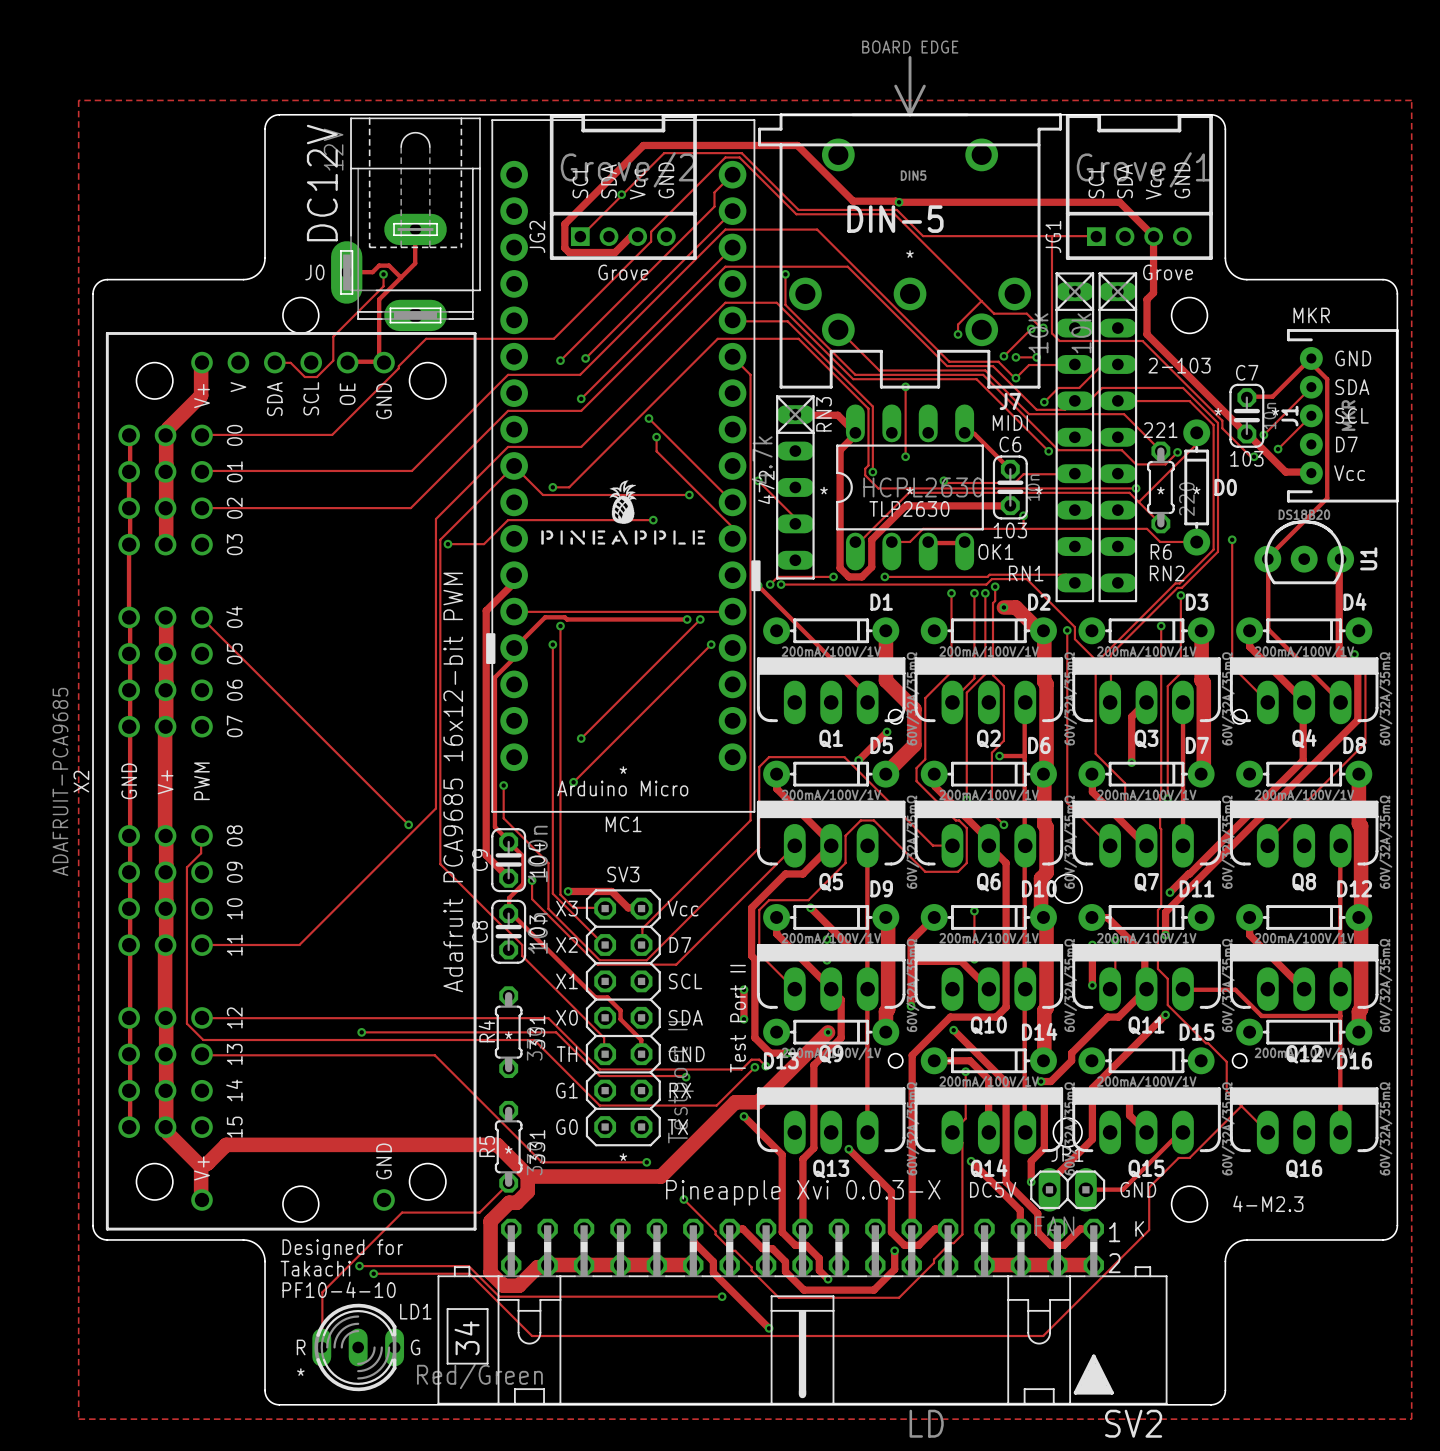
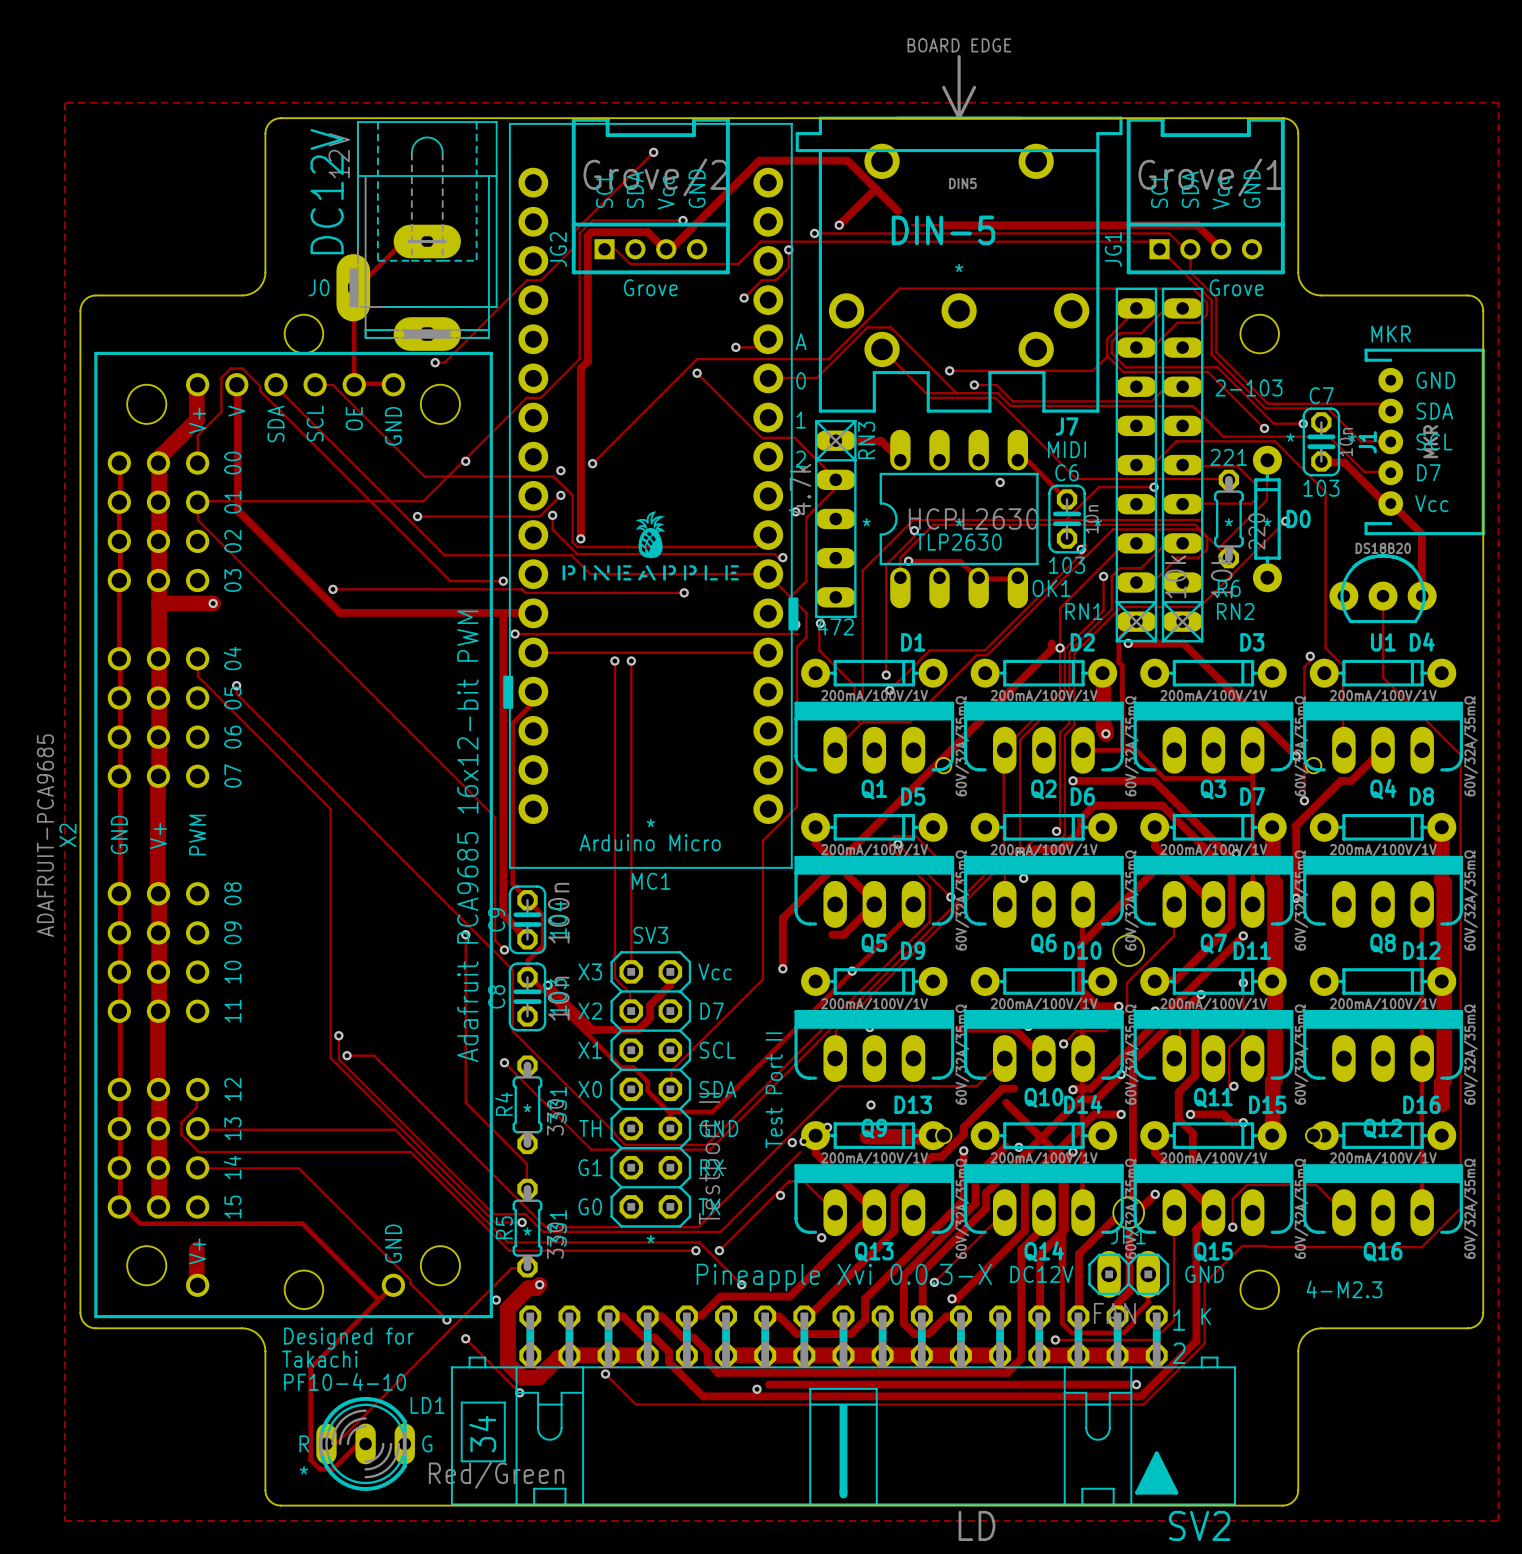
track: none -> (653, 152) (574, 231) (574, 246) (540, 280) (526, 280) (444, 362) (435, 362)
via: none -> (653, 152)
track: (806, 154) (797, 145) (643, 145) (568, 220) -> (847, 160) (759, 160) (671, 248) (663, 247) (647, 232) (591, 232)
track: (732, 174) (714, 192) (714, 206) (560, 360) -> none
track: none -> (875, 188) (839, 225)
via: (621, 194) -> none
track: (853, 201) (1119, 202) (1131, 214) -> (942, 225) (1197, 225)
via: (899, 202) -> none
via: none -> (683, 220)
track: (732, 211) (585, 358) -> none
via: none -> (839, 225)
track: (866, 214) (796, 214) (739, 157) (725, 157) (651, 231) (651, 241) (553, 338) (426, 338) (332, 434) (202, 434) -> (503, 581) (450, 581) (260, 390) (260, 386) (242, 368) (230, 368) (221, 377) (221, 411) (197, 435) (197, 462)
track: (894, 214) (994, 313) (1026, 313) (1043, 327) -> none
via: none -> (814, 233)
track: (415, 229) (415, 263) (379, 299) (379, 360) (384, 362) -> (426, 241) (403, 241) (356, 288) (353, 287) (354, 384)
track: (817, 229) (949, 361) (998, 361) (1015, 378) (1029, 365) (1074, 364) -> (859, 241) (1151, 241) (1158, 248)
track: (1151, 233) (1153, 236) (1153, 292) (1147, 299) (1147, 334) (1285, 472) (1305, 472) -> (1321, 461) (1344, 462) (1384, 502)
track: (637, 236) (630, 237) (615, 252) (569, 252) (564, 248) -> (580, 538) (580, 368) (587, 361) (587, 261)
track: (1051, 236) (1051, 322) -> (1182, 308) (1165, 308) (1141, 333) (1120, 333) (1111, 341)
track: (1095, 236) (923, 236) (896, 209) (798, 209) (741, 153) (664, 153) (580, 236) -> (738, 263) (630, 263) (616, 249) (604, 249)
via: none -> (788, 249)
track: (732, 247) (581, 398) -> none
track: (704, 250) (580, 374) (521, 374) -> (683, 220) (592, 220) (579, 233) (579, 359) (540, 397)
track: (725, 266) (847, 266) (947, 366) (993, 366) (1036, 409) (1065, 409) (1074, 399) (1090, 399) (1102, 387) (1183, 387) (1218, 422) (1218, 551) (1181, 587) (1177, 587) (1110, 654) (1110, 702) -> (760, 281) (775, 280) (788, 267) (788, 249)
track: (346, 272) (372, 272) (379, 265) (389, 265) (401, 277) -> none
track: (383, 274) (383, 286) (333, 336) (333, 360) (316, 377) (304, 377) (290, 362) (275, 362) -> none
via: (383, 274) -> none
track: (785, 274) (785, 304) (855, 374) (883, 374) -> none
via: (785, 274) -> none
track: (710, 282) (581, 410) (508, 410) (410, 508) (202, 508) -> none
via: none -> (744, 298)
track: none -> (1136, 308) (1107, 339) (1107, 355) (1123, 372) (1208, 372) (1264, 428)
track: (981, 301) (958, 324) (958, 334) -> none
track: (732, 320) (787, 321) (872, 406) (872, 472) -> (768, 339) (760, 347) (735, 347)
text: none -> A (801, 341)
via: none -> (735, 347)
via: (1043, 327) -> none
track: (1031, 328) (1003, 356) -> none
via: (1031, 328) -> none
via: (958, 334) -> none
track: none -> (1107, 356) (1092, 370) (949, 370)
track: (717, 338) (569, 487) (552, 487) -> (752, 359) (697, 359) (592, 463)
track: (788, 338) (798, 338) (868, 408) (868, 465) (865, 468) (865, 475) (878, 488) -> (828, 359) (899, 288) (1192, 288) (1206, 302) (1206, 314) (1198, 322) (1177, 322) (1152, 347) (1136, 347)
track: (1059, 340) (1142, 340) (1222, 420) (1222, 428) (1250, 456) (1254, 456) -> (1120, 361) (1125, 367) (1217, 367) (1273, 423) (1303, 423)
via: none -> (435, 362)
via: none -> (949, 370)
track: none -> (697, 373) (761, 437) (794, 437) (835, 479)
via: none -> (697, 373)
track: (732, 356) (750, 374) (750, 820) (642, 928) (641, 944) -> (768, 378) (816, 377) (867, 327) (890, 327) (956, 393)
via: (1003, 356) -> none
track: (1015, 357) (1036, 357) -> none
via: (1015, 357) -> none
via: (1036, 357) -> none
via: (585, 358) -> none
text: none -> 0 (801, 380)
via: (560, 360) -> none
track: none -> (236, 384) (237, 510) (340, 612) (533, 613)
via: none -> (974, 384)
track: (946, 370) (985, 370) (1029, 414) (1124, 414) (1160, 450) -> (997, 393) (1010, 406) (1192, 406) (1223, 436) (1329, 436) (1364, 471) (1390, 472)
track: (943, 374) (983, 374) (1058, 450) -> (995, 397) (1076, 478) (1118, 478)
via: (1015, 378) -> none
track: (1089, 378) (1079, 387) (1058, 387) (1044, 402) -> (1151, 401) (1013, 401) (996, 384) (974, 384)
track: (905, 386) (905, 456) -> none
via: (905, 386) -> none
track: (1311, 387) (1263, 434) -> (1390, 411) (1383, 403) (1268, 403) (1216, 352) (1216, 298) (1190, 272) (1190, 249) (1184, 248) (1169, 233) (814, 233)
text: none -> 1 (801, 420)
track: (1246, 397) (1272, 396) (1310, 358) (1309, 361) (1327, 379) (1327, 498) (1268, 557) (1268, 629) (1340, 702) -> none
via: (581, 398) -> none
via: none -> (1303, 423)
track: (1117, 400) (1189, 401) (1203, 415) -> (1136, 464) (1152, 464) (1176, 441) (1275, 441)
via: (1044, 402) -> none
via: none -> (1264, 428)
track: (1311, 415) (1278, 449) -> (1390, 441) (1360, 441) (1327, 408) (1265, 408) (1211, 354) (1211, 300) (1159, 249)
track: (648, 418) (732, 502) -> (315, 384) (332, 384) (424, 476) (553, 476) (572, 495) (572, 542) (577, 547) (755, 547) (768, 535)
via: (648, 418) -> none
track: (1213, 425) (1213, 549) (1179, 583) (1175, 583) (1095, 663) (1095, 753) (1125, 783) (1125, 809) -> none
text: none -> 2 (800, 459)
track: (855, 432) (840, 450) (840, 568) (848, 576) (861, 576) (871, 567) (871, 539) (905, 505) (1010, 505) -> none
via: none -> (465, 461)
via: (1263, 434) -> none
via: none -> (592, 463)
track: (656, 437) (656, 451) (731, 526) (731, 538) -> (276, 384) (276, 387) (444, 555) (571, 555) (590, 574) (767, 574)
via: (656, 437) -> none
RN1 rotation: 0° (1074, 437) -> 180° (1136, 465)
track: none -> (1182, 465) (1237, 466) (1257, 485)
RN2 rotation: 0° (1117, 437) -> 180° (1182, 465)
via: none -> (560, 470)
track: (1196, 444) (1138, 502) -> (1266, 473) (1266, 500) (1221, 545)
via: (1278, 449) -> none
track: (1121, 450) (1136, 464) (1165, 464) (1177, 452) -> (1186, 478) (1228, 478)
track: none -> (835, 480) (835, 488) (806, 517) (806, 581) (790, 596)
track: (1048, 451) (976, 379) (853, 379) (776, 302) (725, 302) (581, 446) (508, 446) (435, 519) (435, 808) (299, 944) (202, 944) -> none
via: (1048, 451) -> none
via: (1177, 452) -> none
via: none -> (1000, 482)
via: (905, 456) -> none
via: (1254, 456) -> none
via: none -> (1154, 487)
track: none -> (560, 495) (539, 516) (417, 516)
via: none -> (560, 495)
track: none -> (1257, 497) (1251, 503) (1182, 504)
track: none -> (197, 502) (197, 520) (495, 817) (495, 940) (504, 949)
via position: (872, 472) -> (914, 530)
track: (1074, 473) (1023, 474) -> (1154, 487) (1098, 487) (1081, 504)
track: (758, 480) (795, 517) (795, 523) -> none
track: (943, 480) (946, 482) (1014, 482) -> (1065, 520) (1071, 514)
via: (943, 480) -> none
via: none -> (552, 515)
via: none -> (417, 516)
via: (552, 487) -> none
text rotation: 0° (766, 487) -> 90° clockwise (835, 626)
text position: 472 (766, 487) -> 472 (835, 626)
track: none -> (925, 520) (913, 520) (862, 570) (862, 713)
via: (1136, 488) -> none
via: none -> (1285, 521)
track: (908, 492) (859, 541) (855, 542) -> (957, 524) (933, 524) (900, 557) (900, 577)
track: (689, 494) (543, 494) (514, 465) (440, 539) (440, 864) (522, 944) (522, 955) (604, 1037) (605, 1054) -> none
via: (689, 494) -> none
track: none -> (914, 530) (914, 536) (886, 564) (886, 675)
via: none -> (580, 538)
track: none -> (1085, 544) (1085, 549) (984, 650) (929, 650) (889, 690)
track: (555, 520) (508, 520) (484, 544) (447, 544) -> (577, 554) (552, 529) (552, 515)
track: none -> (683, 554) (774, 554) (778, 557) (782, 557)
via: (653, 520) -> none
via: none -> (782, 557)
track: none -> (908, 561) (960, 561) (978, 577)
via: none -> (908, 561)
track: none -> (768, 574) (806, 612) (806, 637) (796, 646) (796, 806) (762, 840) (762, 979) (671, 1070) (670, 1089)
track: (1232, 539) (1232, 666) (1267, 701) -> (1285, 451) (1325, 491) (1325, 648) (1343, 665) (1343, 749)
via: (1232, 539) -> none
via: none -> (1103, 576)
track: (891, 542) (909, 541) (923, 528) (1147, 528) (1160, 541) (1196, 542) -> none
track: none -> (158, 580) (158, 658)
via: (447, 544) -> none
via: none -> (503, 581)
track: none -> (1136, 582) (1152, 582) (1177, 557) (1198, 557) (1206, 549) (1206, 537) (1198, 529) (1112, 529) (987, 655) (976, 655) (909, 722) (862, 722) (835, 750)
track: none -> (332, 589) (522, 589) (525, 592) (684, 592)
via: none -> (332, 589)
via: none -> (684, 592)
U1 name rotation: 0° (1368, 558) -> 90° clockwise (1383, 642)
U1 name position: U1 (1368, 558) -> U1 (1383, 642)
track: (1340, 559) (1339, 654) (1357, 673) (1357, 719) (1165, 912) (1165, 935) -> (1422, 596) (1421, 534) (1390, 503)
track: none -> (159, 603) (213, 603)
via: none -> (213, 603)
track: (514, 575) (513, 583) (486, 610) -> (503, 612) (503, 651)
track: (833, 576) (777, 576) (770, 584) -> none
via: (833, 576) -> none
track: (884, 576) (1066, 574) (1074, 582) -> (1122, 750) (1122, 665) (1118, 662) (1118, 638) (1136, 621)
via: (884, 576) -> none
via: (770, 584) -> none
track: (781, 584) (986, 584) (991, 579) (1026, 579) (1074, 627) (1074, 639) (1097, 661) -> none
track: (758, 585) (867, 694) (867, 702) -> none
track: (995, 586) (995, 600) (993, 603) (993, 675) (1003, 686) -> (1182, 543) (1165, 543) (1141, 568) (1120, 568) (1111, 576) (1111, 609) (1069, 651) (1069, 723) (1060, 732)
via: (995, 586) -> none
track: none -> (819, 629) (819, 650) (854, 685) (854, 717) (860, 723)
track: (951, 593) (951, 671) (925, 698) (925, 759) (916, 768) (916, 781) (955, 820) (959, 820) (966, 828) (966, 863) (958, 871) (925, 871) (882, 829) -> none
via: (951, 593) -> none
track: (974, 593) (974, 678) -> (1136, 543) (1124, 543) (1060, 608) (1060, 692) (1028, 724)
via: (974, 593) -> none
track: (985, 593) (985, 674) -> (1103, 576) (1103, 610) (1064, 649) (1064, 695) (1040, 719)
via: (985, 593) -> none
track: none -> (515, 633) (798, 633)
via: none -> (515, 633)
track: (1180, 595) (1180, 673) (1167, 686) (1167, 798) -> none
via: (1180, 595) -> none
D4 name position: D4 (1354, 601) -> D4 (1422, 641)
D1 name position: D1 (881, 602) -> D1 (913, 642)
D2 name position: D2 (1039, 602) -> D2 (1082, 642)
D3 name position: D3 (1197, 602) -> D3 (1252, 642)
track: none -> (1051, 643) (1051, 649) (782, 918) (782, 968)
track: none -> (1128, 643) (1183, 643) (1296, 756)
track: (1003, 607) (1015, 607) (1036, 628) (1043, 630) -> none
track: none -> (1310, 656) (1310, 661) (1304, 666) (1304, 800)
via: none -> (1310, 656)
track: (202, 618) (408, 824) -> (197, 659) (197, 676) (330, 809) (330, 1058) (495, 1222) (522, 1222)
via: none -> (614, 661)
via: none -> (631, 661)
track: (687, 619) (567, 619) (564, 617) (545, 617) (514, 647) -> none
via: (687, 619) -> none
track: (700, 619) (581, 738) -> none
via: (700, 619) -> none
track: (560, 626) (560, 894) (573, 907) (605, 908) -> (631, 661) (631, 971)
via: (560, 626) -> none
track: (1161, 626) (1161, 906) (1157, 910) (1157, 969) (1167, 978) (1167, 1005) (1226, 1061) (1226, 1091) (1242, 1106) -> (1232, 1227) (1232, 1199) (1246, 1184) (1316, 1184)
via: (1161, 626) -> none
track: (885, 630) (885, 680) (914, 709) (914, 745) (885, 774) -> none
track: (1067, 630) (1067, 802) (1110, 845) -> (1063, 1043) (1076, 1031) (1105, 1031) (1127, 1009) (1127, 982) (1174, 935) (1174, 904)
via position: (1067, 630) -> (1128, 643)
track: (1201, 630) (1201, 680) (1203, 682) (1203, 771) (1201, 774) -> (1272, 1135) (1272, 1081) (1275, 1079) (1275, 984) (1272, 981) (1275, 974) (1275, 883) (1272, 880) (1272, 827)
track: (1249, 630) (1249, 646) (1304, 702) -> none
via: none -> (886, 675)
track: none -> (236, 685) (236, 693) (512, 969) (512, 1031) (614, 1134)
via: none -> (236, 685)
track: (552, 644) (552, 893) (604, 944) -> (614, 661) (614, 978) (630, 993) (630, 1011)
via: (552, 644) -> none
track: (711, 644) (573, 782) -> none
via: (711, 644) -> none
via: none -> (889, 690)
track: (1354, 654) (1354, 659) (1365, 670) (1365, 742) (1268, 840) (1267, 845) -> none
via: (1354, 654) -> none
track: (1046, 687) (1046, 768) (1043, 774) (1046, 872) (1041, 878) (1041, 911) (1046, 919) (1046, 1008) (1044, 1010) (1043, 1060) -> none
via: none -> (1105, 733)
track: (1025, 702) (1025, 845) -> (1083, 750) (1136, 750) (1164, 778) (1252, 778)
track: (1146, 702) (1131, 716) (1131, 762) -> none
track: (1303, 702) (1303, 760) (1169, 892) -> (1381, 750) (1351, 780) (1340, 780) (1296, 825) (1296, 898)
via: none -> (1296, 756)
track: none -> (1073, 780) (1154, 780) (1231, 858)
via: none -> (1073, 780)
track: (887, 732) (858, 760) -> none
via: (887, 732) -> none
via: (581, 738) -> none
track: (1003, 740) (991, 752) (991, 812) (1003, 824) -> (1060, 791) (1060, 827) (1056, 831)
D5 name position: D5 (881, 745) -> D5 (913, 796)
D6 name position: D6 (1039, 745) -> D6 (1082, 796)
D7 name position: D7 (1197, 745) -> D7 (1252, 796)
D8 name position: D8 (1354, 745) -> D8 (1421, 796)
via: none -> (1304, 800)
track: (999, 756) (1024, 756) -> none
via: (999, 756) -> none
via position: (858, 760) -> (897, 844)
via: (1131, 762) -> none
track: (934, 774) (935, 786) (987, 839) (988, 845) (1006, 863) (1006, 1007) (996, 1017) (961, 1017) -> none
via: none -> (1056, 831)
via: (573, 782) -> none
track: (869, 782) (844, 757) (769, 757) (759, 766) (759, 847) (646, 960) (599, 960) (548, 908) (548, 863) (503, 818) (503, 785) -> (915, 836) (894, 836) (889, 840) (889, 847) (920, 877)
via: (503, 785) -> none
track: none -> (897, 844) (950, 897)
track: none -> (1154, 871) (1081, 944) (1081, 989) (1097, 1006) (1118, 1006)
track: (873, 820) (860, 820) (845, 835) (845, 863) (808, 900) (769, 900) (759, 910) (759, 953) (794, 989) -> (1020, 846) (835, 1031) (835, 1058)
track: none -> (1023, 878) (1023, 860) (1035, 848) (1061, 848) (1081, 828) (1081, 818) (1094, 805) (1162, 805) (1231, 874) (1231, 924) (1175, 980) (1154, 981)
via: none -> (1023, 878)
via: (408, 824) -> none
via: (1003, 824) -> none
track: (914, 827) (932, 845) (952, 845) -> (1285, 521) (1199, 606) (1121, 606) (1074, 653) (1074, 725) (1064, 735) (1064, 834) (1058, 840) (1033, 840) (1004, 868) (1004, 904)
track: (202, 835) (201, 853) (186, 867) (186, 1023) (203, 1040) (534, 1040) -> (504, 1062) (554, 1113)
via: none -> (950, 897)
via: none -> (1296, 898)
track: (794, 845) (676, 964) (597, 964) (532, 899) (532, 880) -> none
track: (867, 852) (867, 1132) -> (913, 911) (712, 1112) (670, 1113)
track: none -> (465, 934) (465, 1102) (526, 1163) (527, 1188)
via: none -> (465, 934)
track: (792, 873) (785, 873) (751, 907) (751, 955) (754, 959) (754, 1037) (770, 1053) (787, 1053) -> none
track: none -> (1243, 935) (1090, 1088) (1073, 1089)
via: none -> (1243, 935)
via: (532, 880) -> none
via: none -> (504, 949)
D9 name position: D9 (881, 888) -> D9 (913, 950)
D10 name position: D10 (1039, 888) -> D10 (1082, 950)
D11 name position: D11 (1197, 888) -> D11 (1252, 950)
D12 name position: D12 (1354, 888) -> D12 (1421, 950)
track: (568, 891) (611, 891) (628, 907) (641, 908) -> (547, 985) (592, 1029) (638, 1029) (650, 1018) (650, 1005) (670, 985) (670, 971)
via: (568, 891) -> none
via: (1169, 892) -> none
via: none -> (782, 968)
track: (810, 907) (857, 954) -> none
track: (974, 911) (974, 959) -> none
via: (974, 911) -> none
track: (776, 917) (776, 934) (841, 999) (841, 1037) (813, 1065) (813, 1148) (802, 1159) (802, 1228) -> none
track: (885, 917) (888, 919) (888, 1009) (885, 1011) (885, 1032) -> none
track: (934, 917) (911, 940) (911, 1006) -> none
track: (1091, 917) (1107, 917) (1144, 954) (1144, 986) (1146, 989) (1118, 1017) (1107, 1017) (1071, 1053) -> (1201, 994) (1132, 1061) (1132, 1127)
track: (1249, 917) (1249, 935) (1304, 989) -> none
track: none -> (1243, 982) (1243, 1033) (1229, 1047) (1229, 1103)
via: none -> (1243, 982)
via: none -> (547, 985)
via: none -> (1201, 994)
via: (1165, 935) -> none
via: (826, 939) -> none
via: none -> (1118, 1006)
via: (1115, 940) -> none
track: (1092, 944) (1092, 985) -> none
track: none -> (1201, 1011) (1195, 1016) (1195, 1075) (1178, 1092) (1178, 1119) (1192, 1133) (1192, 1173)
track: none -> (338, 1035) (338, 1059) (493, 1214) (525, 1214) (543, 1231) (720, 1231) (800, 1152)
via: none -> (338, 1035)
via: none -> (1063, 1043)
via: (1092, 985) -> none
via: none -> (347, 1055)
track: (743, 989) (743, 1019) -> none
via: (743, 989) -> none
track: (1182, 989) (1235, 989) (1261, 1015) (1340, 1015) -> none
via: none -> (504, 1062)
track: none -> (1121, 1074) (1096, 1099) (1080, 1099) (986, 1193) (986, 1208) (922, 1271) (921, 1316)
via: none -> (1121, 1074)
via: (911, 1006) -> none
track: (1165, 1014) (1092, 1088) (1092, 1139) (1049, 1182) (1049, 1189) -> none
track: (202, 1017) (548, 1018) (589, 1059) -> (197, 1089) (196, 1107) (181, 1122) (181, 1134) (199, 1152) (410, 1152) (509, 1250) (695, 1250)
via: none -> (1073, 1089)
via: (743, 1019) -> none
via: (953, 1030) -> none
D14 name position: D14 (1039, 1031) -> D14 (1083, 1104)
track: (361, 1032) (556, 1032) (599, 1076) (686, 1077) -> none
via: (361, 1032) -> none
track: (828, 1032) (758, 1102) (735, 1102) (660, 1176) (527, 1176) -> none
D13 position: (831, 1032) -> (874, 1135)
D16 position: (1304, 1032) -> (1383, 1135)
track: none -> (1121, 1114) (1094, 1114) (1024, 1183) (1024, 1230) (956, 1298) (952, 1298)
via: none -> (1121, 1114)
track: none -> (1190, 1114) (1223, 1114) (1231, 1122) (1243, 1122)
via: none -> (1190, 1114)
via: none -> (1243, 1122)
track: (914, 1053) (912, 1055) (911, 1228) -> (1006, 1146) (975, 1176) (975, 1203) (903, 1275) (903, 1323) (914, 1334) (928, 1334) (946, 1316) (960, 1316)
track: none -> (963, 1127) (963, 1134) (941, 1156) (932, 1156) (894, 1194) (894, 1230) (809, 1315) (804, 1316)
track: (385, 1055) (434, 1055) -> (347, 1055) (374, 1055) (448, 1129)
track: none -> (395, 1129) (508, 1242) (699, 1242) (741, 1284)
track: none -> (815, 1135) (815, 1153) (874, 1212) (789, 1296) (720, 1296) (701, 1315) (686, 1316)
D13 name position: D13 (781, 1060) -> D13 (913, 1104)
track: none -> (933, 1135) (867, 1136)
track: (934, 1060) (970, 1060) (988, 1079) (988, 1132) -> (647, 1316) (661, 1316) (683, 1337) (693, 1337) (707, 1351) (707, 1362) (718, 1372) (1007, 1372) (1021, 1358) (1021, 1249) (1043, 1227) (1043, 1212)
track: (1071, 1060) (1050, 1081) (1041, 1081) -> none
track: none -> (1154, 1135) (1155, 1153) (1213, 1212) (1196, 1229) (1196, 1341) (1141, 1396) (703, 1396) (668, 1362) (668, 1351) (654, 1337) (644, 1337) (623, 1316) (608, 1316)
D16 name position: D16 (1354, 1060) -> D16 (1421, 1104)
track: (765, 1066) (759, 1059) (751, 1059) (741, 1069) (675, 1069) -> (929, 886) (929, 921) (706, 1144)
track: (754, 1067) (716, 1105) (599, 1105) (568, 1073) -> (1004, 750) (1003, 856) (710, 1149) (591, 1149)
track: (965, 1071) (965, 1118) (952, 1132) (962, 1142) (962, 1234) (934, 1259) (934, 1262) (899, 1297) (778, 1297) (751, 1270) (751, 1267) (715, 1234) (715, 1231) (683, 1199) -> none
via: none -> (963, 1150)
track: none -> (1073, 1152) (1064, 1160) (1064, 1229) (1040, 1254) (1039, 1316)
via: none -> (1073, 1152)
via: (686, 1077) -> none
via: (1041, 1081) -> none
track: none -> (197, 1167) (298, 1168) (410, 1280) (410, 1283) (446, 1319)
track: (1044, 1093) (1044, 1148) -> (1132, 1135) (1132, 1200) (1103, 1229)
track: (1129, 1098) (1129, 1115) (1146, 1132) -> none
track: (1241, 1106) (1189, 1157) (1178, 1157) (1173, 1163) -> (1383, 596) (1383, 677) (1460, 754) (1460, 1208) (1421, 1247) (1242, 1245)
track: none -> (1155, 1194) (1129, 1220) (1129, 1291) (1117, 1303) (1117, 1316)
via: none -> (1155, 1194)
track: (743, 1116) (782, 1154) (782, 1232) (795, 1245) -> none
track: none -> (119, 1206) (122, 1206) (140, 1223) (302, 1223) (378, 1300)
track: (165, 1127) (168, 1133) (201, 1166) (207, 1163) (226, 1144) (497, 1144) (527, 1175) (527, 1191) (520, 1199) -> none
track: none -> (835, 1212) (802, 1180) (788, 1181) (719, 1250)
track: none -> (1004, 1212) (934, 1282)
track: none -> (1174, 1212) (1174, 1319) (1154, 1339) (1055, 1339)
track: (1182, 1132) (1179, 1132) (1122, 1189) (1085, 1189) -> none
via: none -> (522, 1222)
track: (525, 1145) (541, 1162) (646, 1162) -> (545, 1227) (698, 1227) (839, 1086) (976, 1086) (1004, 1058)
via: none -> (1232, 1227)
track: (848, 1149) (891, 1191) (891, 1232) (904, 1245) (918, 1245) (935, 1228) (948, 1228) -> none
via: (848, 1149) -> none
via: none -> (821, 1237)
track: (971, 1161) (1020, 1210) (1020, 1228) -> none
via: (971, 1161) -> none
track: (1031, 1161) (1031, 1182) -> (1089, 1243) (1078, 1254) (1078, 1316)
via: (646, 1162) -> none
via: none -> (695, 1250)
via: none -> (719, 1250)
track: (1006, 1182) (1037, 1213) (1037, 1232) (1050, 1245) (1063, 1245) (1080, 1228) (1093, 1228) -> (1062, 1265) (1062, 1323) (1071, 1332) (1123, 1332) (1134, 1322) (1134, 1316) (1148, 1302) (1148, 1274)
via: (1031, 1182) -> none
track: (508, 1184) (479, 1212) (402, 1212) (322, 1292) (322, 1346) -> (526, 1268) (511, 1268) (336, 1443) (327, 1443)
track: (1149, 1187) (1149, 1230) (1043, 1336) (532, 1336) (469, 1273) (373, 1273) -> (1216, 1271) (1204, 1283) (1204, 1343) (1143, 1404) (636, 1404) (605, 1374)
text: DC5V (993, 1189) -> DC12V (1041, 1274)
via: none -> (934, 1282)
track: none -> (393, 1285) (310, 1368) (310, 1459) (320, 1469) (332, 1469) (357, 1444) (365, 1443)
via: none -> (539, 1284)
via: (683, 1199) -> none
via: none -> (741, 1284)
via: none -> (952, 1298)
via: none -> (496, 1300)
track: (693, 1228) (693, 1242) (713, 1261) (713, 1272) (769, 1328) -> none
via: none -> (446, 1319)
track: (759, 1245) (762, 1248) (772, 1248) (785, 1261) (785, 1271) (804, 1290) (873, 1290) (894, 1269) (894, 1250) -> (796, 1334) (835, 1334)
track: (806, 1245) (819, 1258) (819, 1270) (828, 1279) -> (847, 1334) (851, 1334) (865, 1319) (865, 1298) (963, 1200) (963, 1150)
track: none -> (465, 1338) (519, 1392)
via: none -> (465, 1338)
via: (894, 1250) -> none
via: none -> (1055, 1339)
track: (620, 1265) (693, 1265) -> (1000, 1355) (726, 1355)
track: (359, 1266) (468, 1266) (499, 1296) (722, 1296) -> none
via: (359, 1266) -> none
via: (373, 1273) -> none
via: (828, 1279) -> none
via: none -> (605, 1374)
track: none -> (768, 1384) (1136, 1384)
via: none -> (1136, 1384)
via: none -> (519, 1392)
via: (769, 1328) -> none

